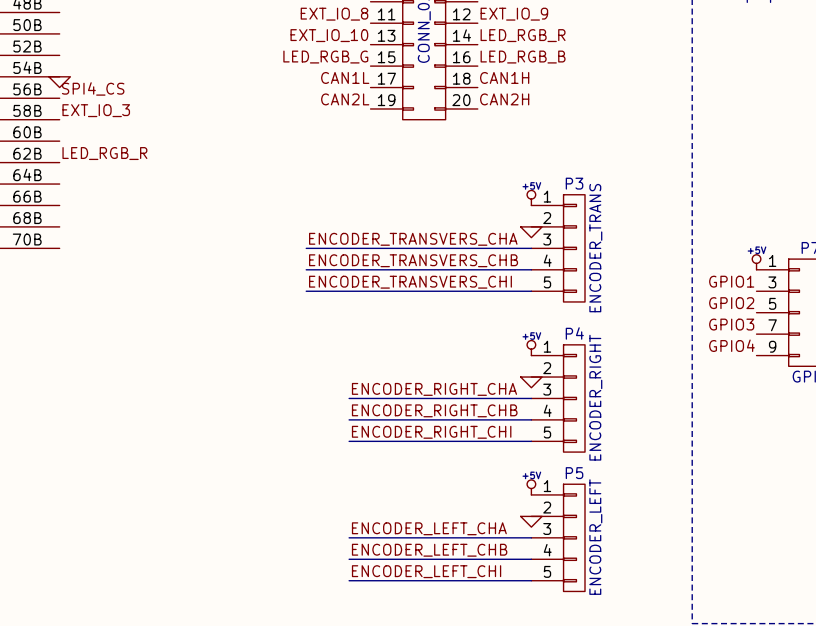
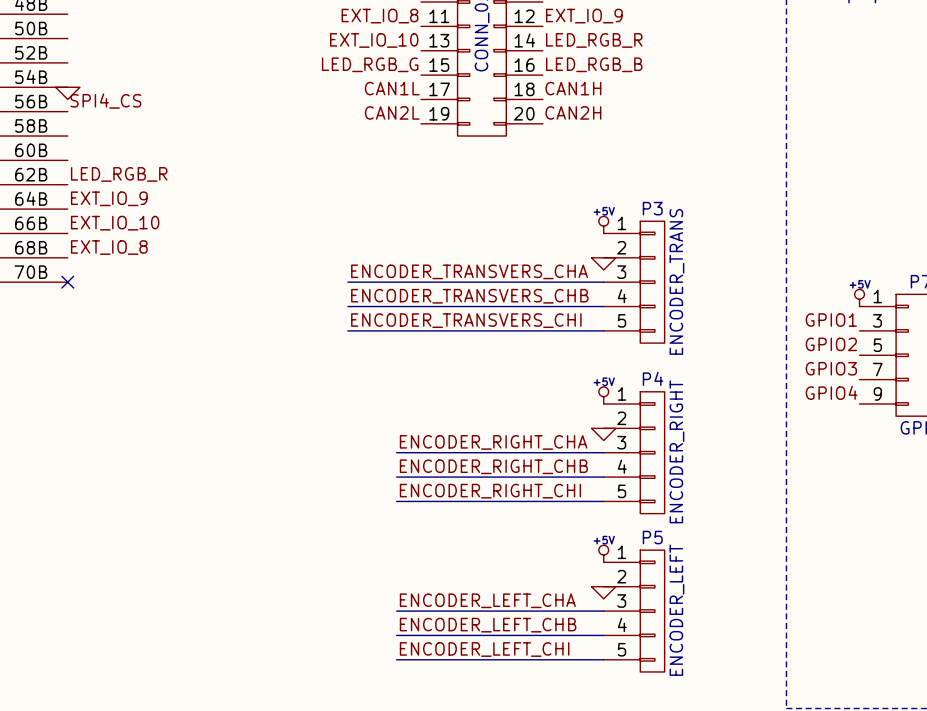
label: EXT_IO_3 (96, 110) -> none
label: none -> EXT_IO_9 (109, 198)
label: none -> EXT_IO_10 (115, 223)
label: none -> EXT_IO_8 (109, 247)
no-connect mark: none -> (67, 282)

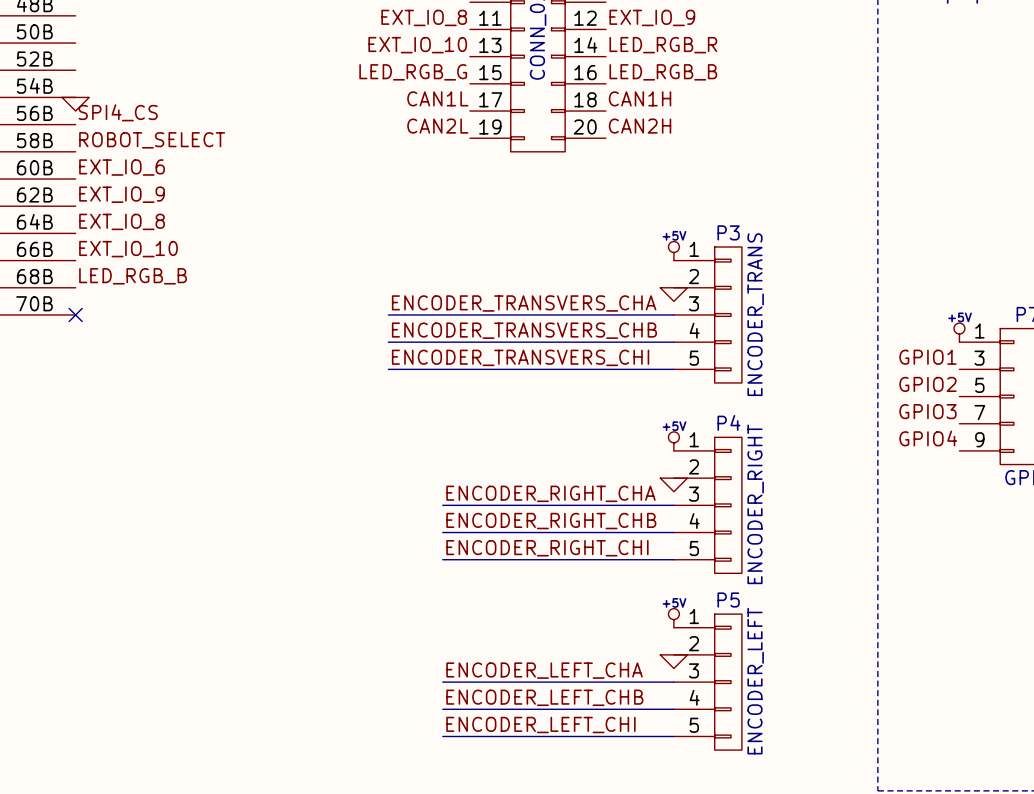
label: none -> ROBOT_SELECT (152, 140)
label: none -> EXT_IO_6 (122, 167)
label: LED_RGB_R (119, 174) -> EXT_IO_9 (122, 194)
label: EXT_IO_9 (109, 198) -> EXT_IO_8 (122, 221)
label: EXT_IO_8 (109, 247) -> LED_RGB_B (133, 276)

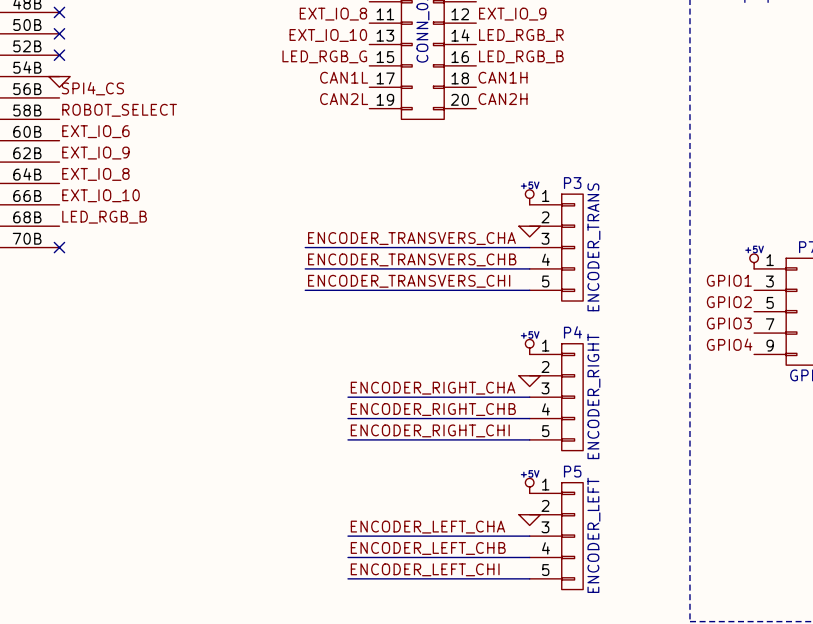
no-connect mark: none -> (59, 12)
no-connect mark: none -> (59, 33)
no-connect mark: none -> (59, 55)

